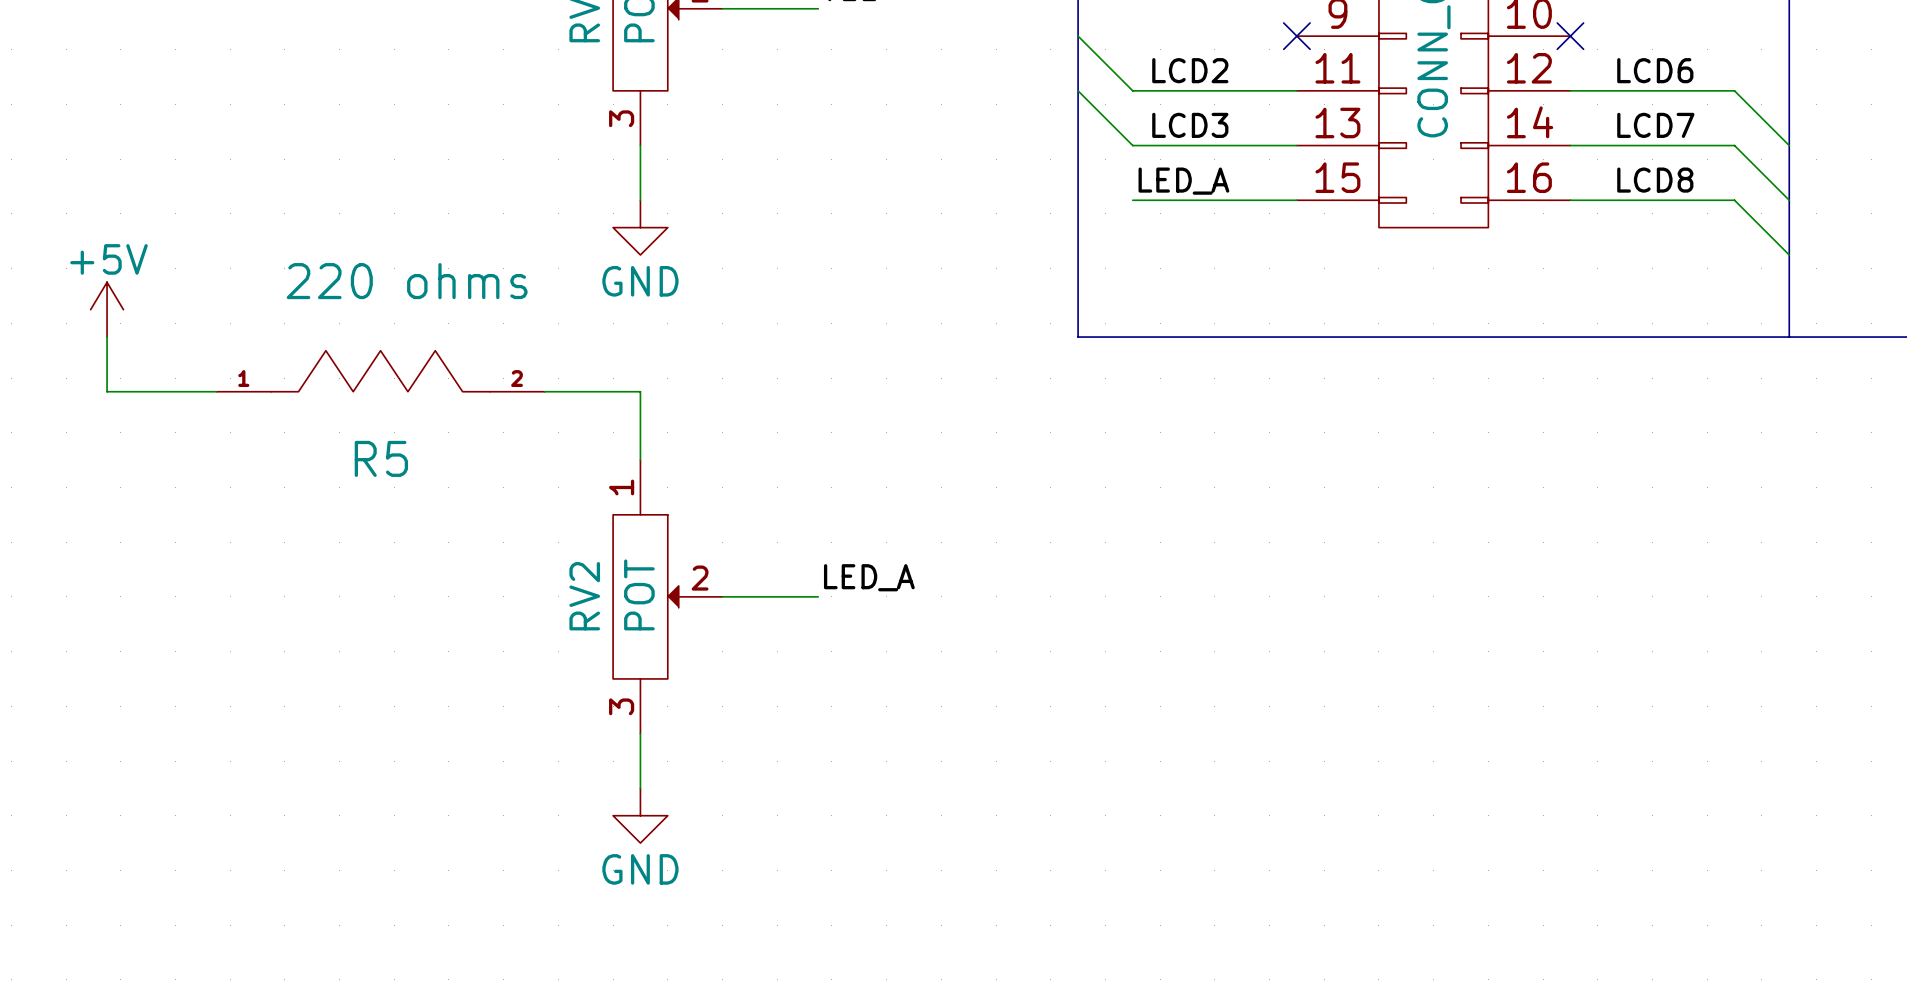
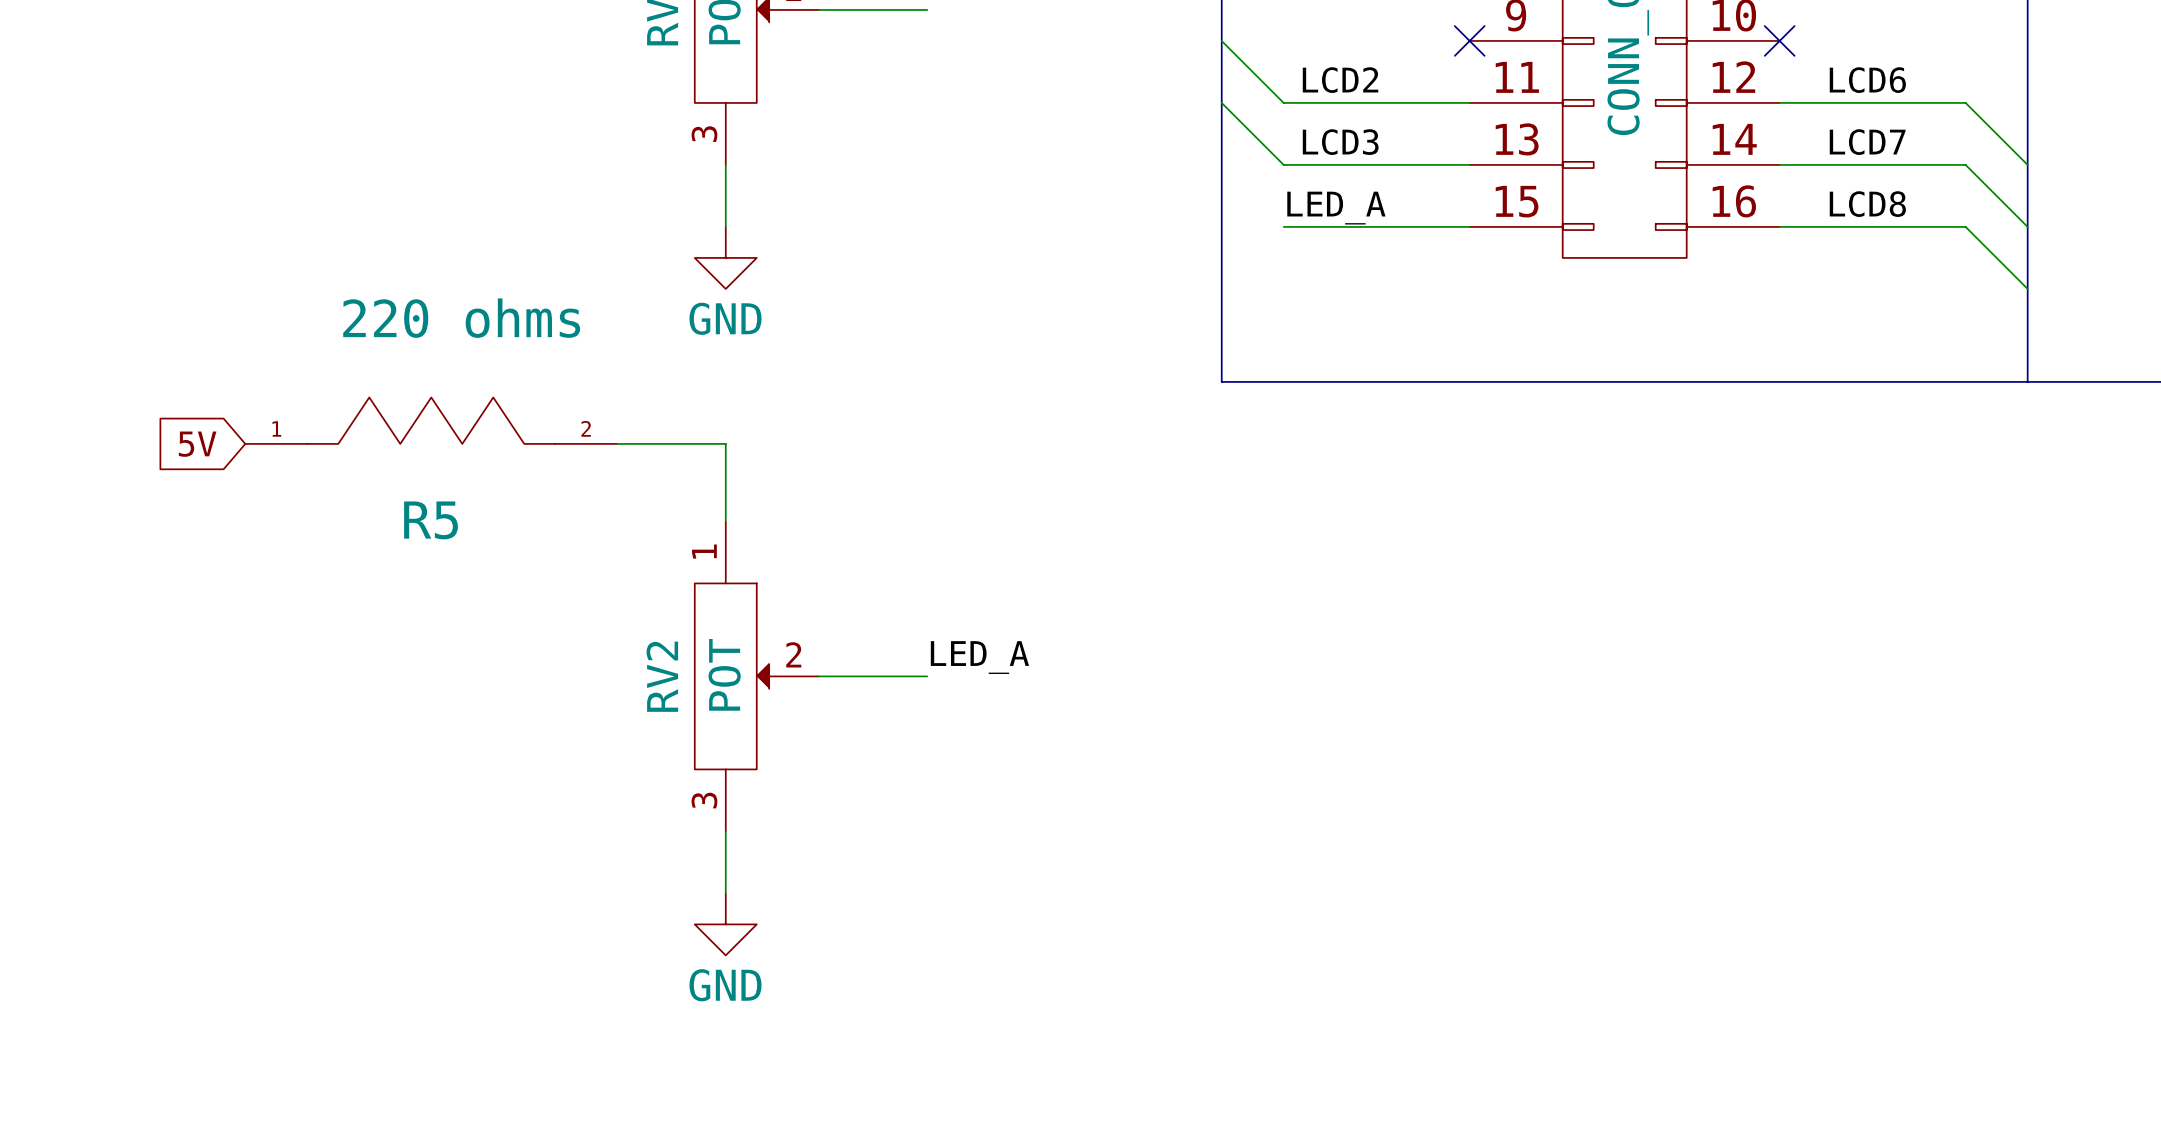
power symbol: +5V (107, 309) -> none
wire: (107, 337) (107, 391) (216, 391) -> none
global label: none -> 5V (197, 444)

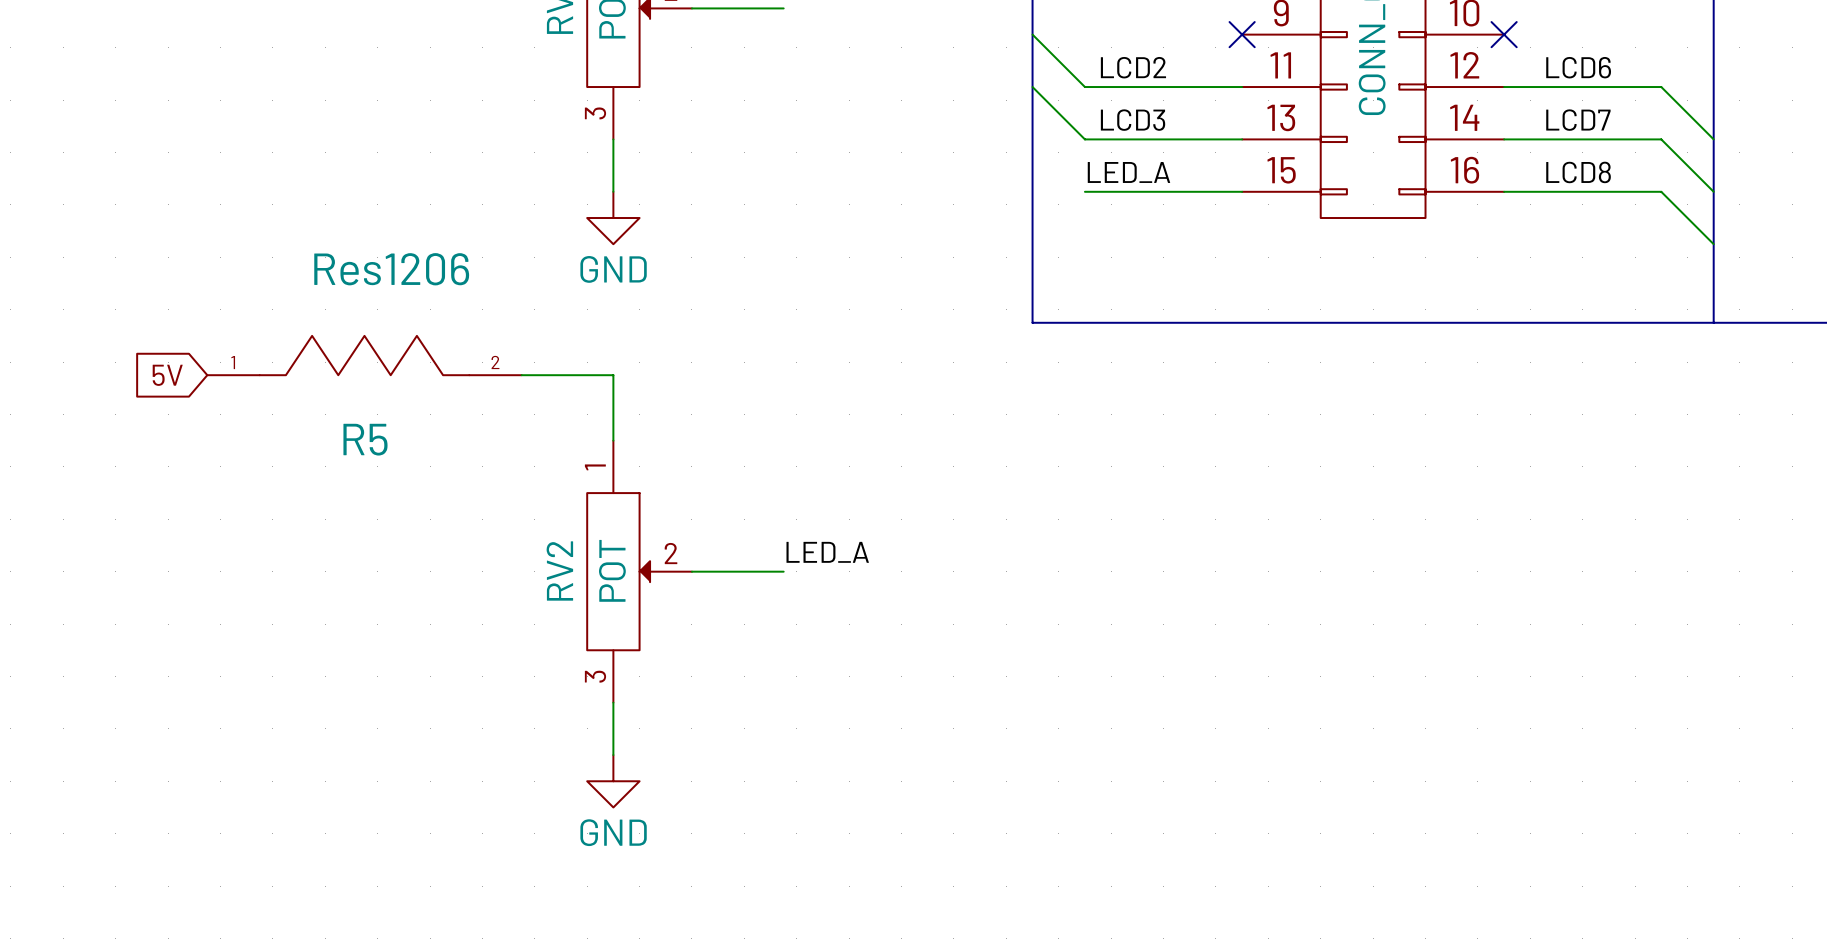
R5 value: 220 ohms (461, 318) -> Res1206 (391, 269)

